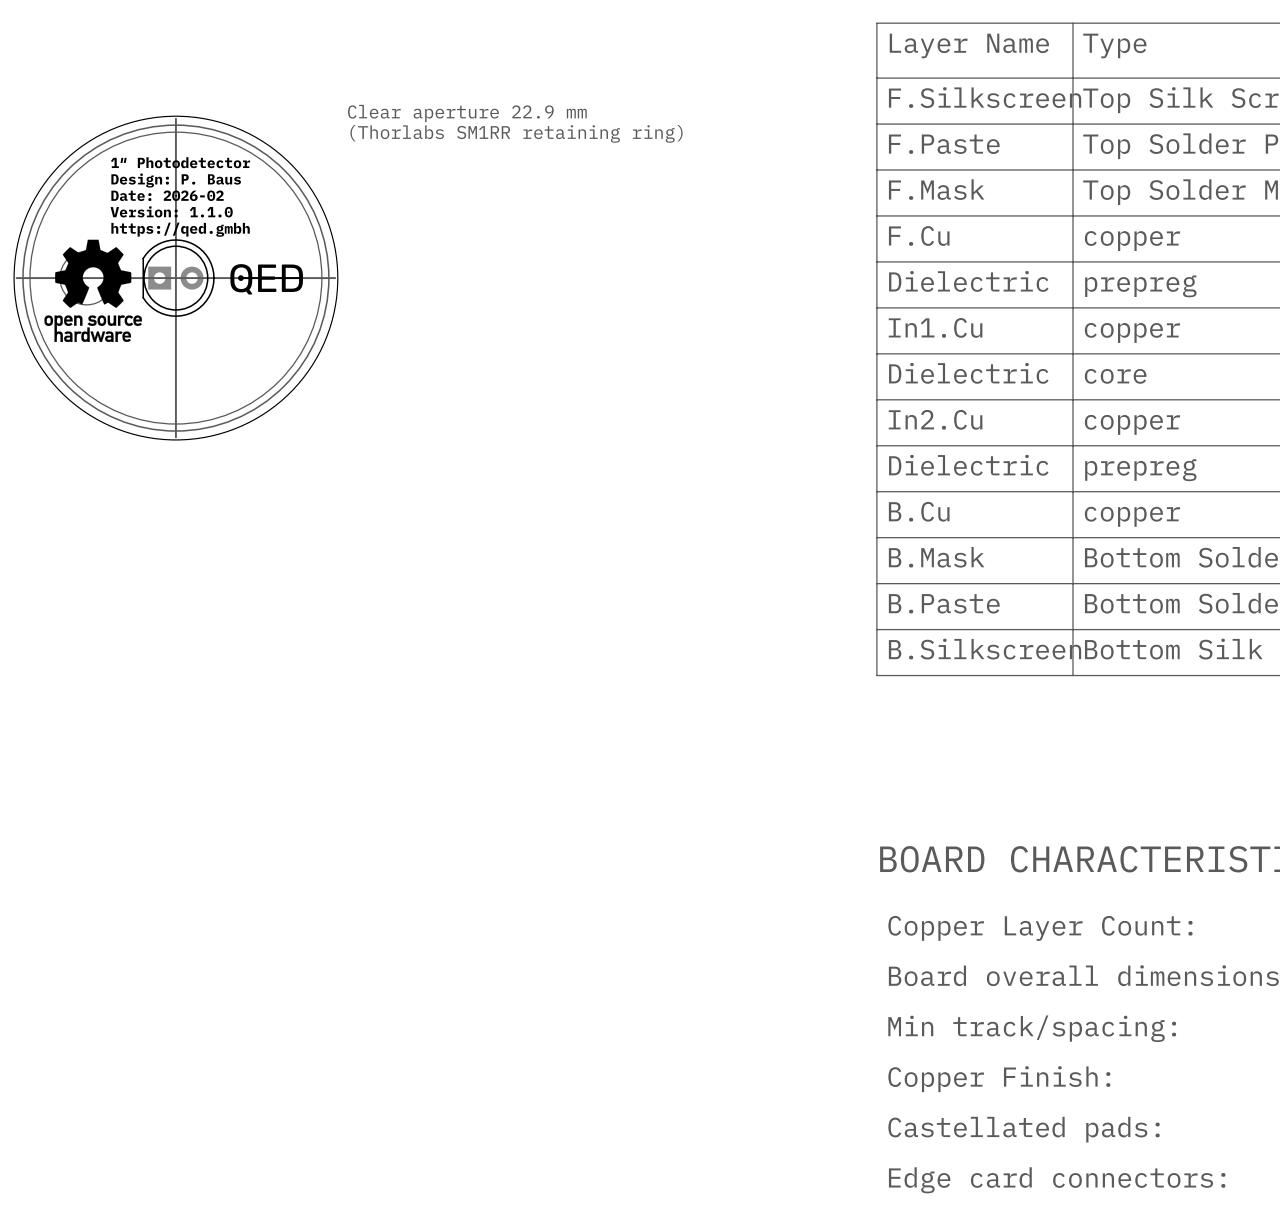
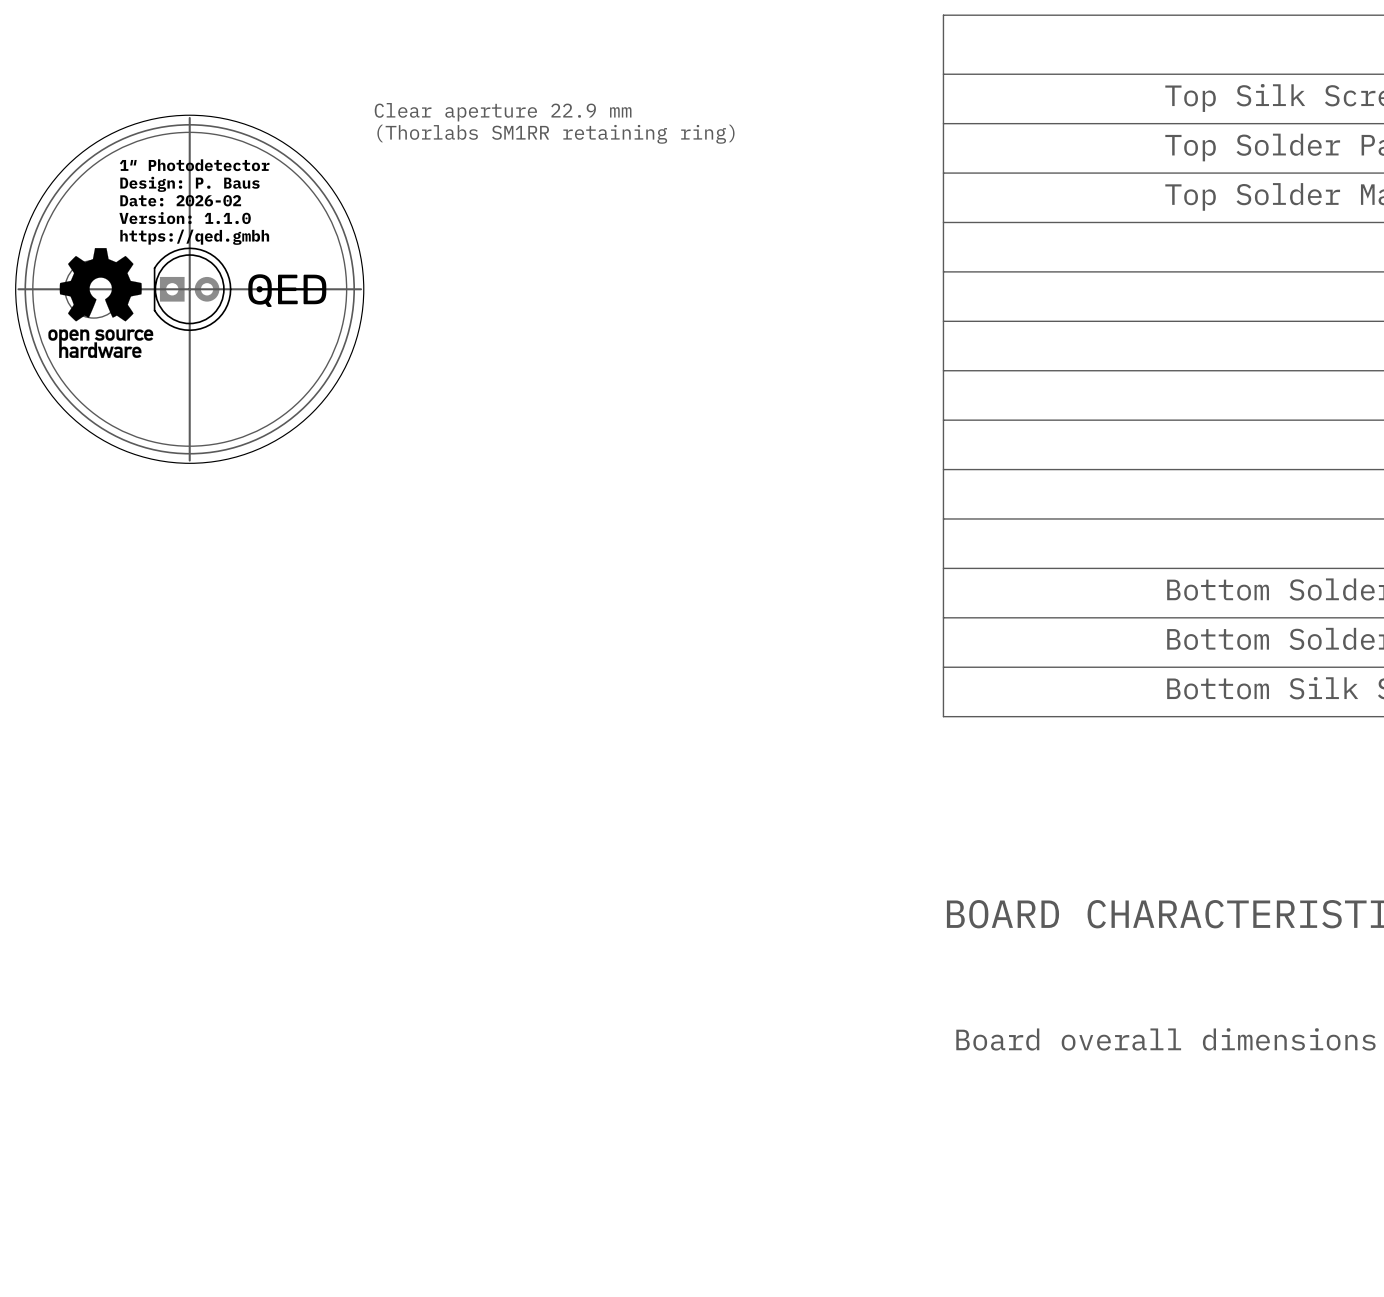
line: (1072, 23) (1072, 675) -> none
text: Layer Name (969, 45) -> none
text: Type (1114, 45) -> none
text: F.Silkscreen (985, 97) -> none
text: F.Paste (944, 144) -> none
text: F.Mask (936, 189) -> none
text: F.Cu (919, 235) -> none
text: copper (1132, 241) -> none
text: Dielectric (968, 281) -> none
text: prepreg (1140, 286) -> none
text: In1.Cu (935, 327) -> none
text: copper (1132, 332) -> none
text: Dielectric (968, 373) -> none
text: core (1115, 376) -> none
text: In2.Cu (935, 419) -> none
text: copper (1132, 424) -> none
text: Dielectric (968, 465) -> none
text: prepreg (1140, 470) -> none
text: B.Cu (919, 511) -> none
text: copper (1132, 516) -> none
text: B.Mask (936, 557) -> none
text: B.Paste (944, 603) -> none
text: B.Silkscreen (985, 649) -> none
text: Copper Layer Count: (1040, 928) -> none
text: Min track/spacing: (1032, 1028) -> none
text: Copper Finish: (999, 1079) -> none
text: Castellated pads: (1024, 1129) -> none
text: Edge card connectors: (1057, 1180) -> none

